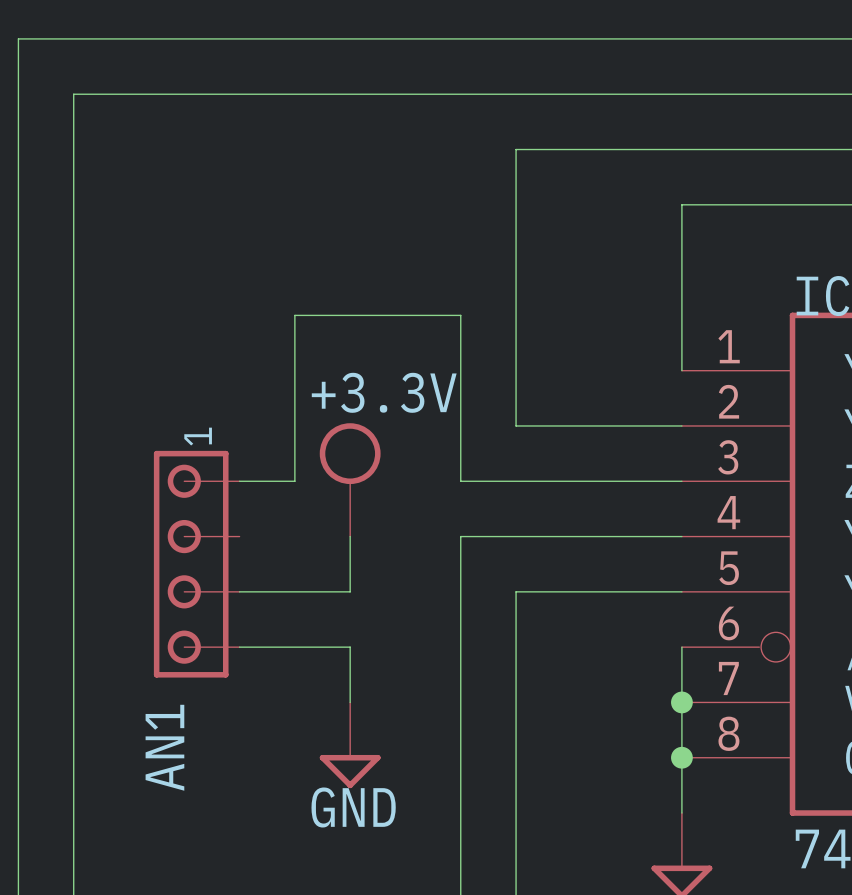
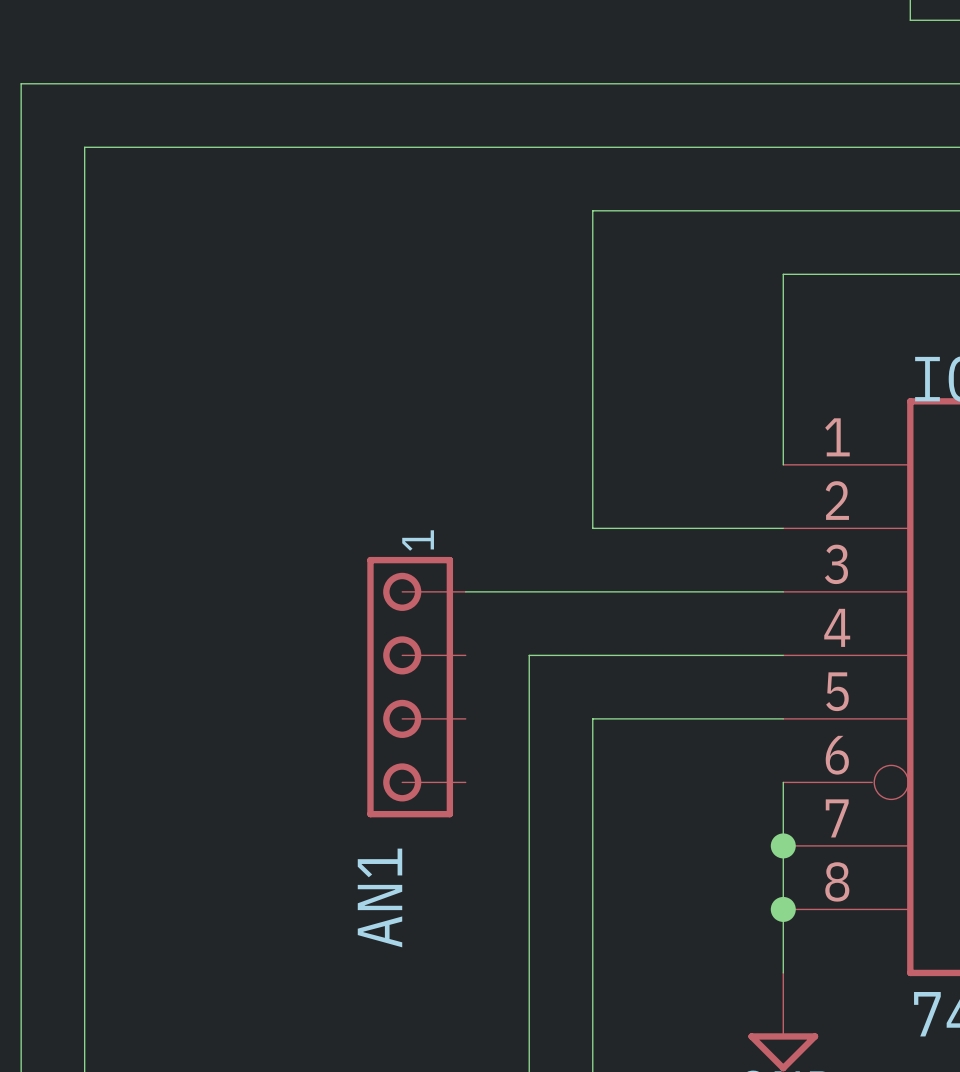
power symbol: +3.3V (350, 479) -> none
wire: (239, 481) (294, 481) (294, 315) (460, 315) (460, 481) -> (465, 591) (529, 591)
wire: (350, 536) (350, 591) (239, 591) -> none
AN1 position: (196, 564) -> (416, 687)
wire: (239, 647) (350, 647) (350, 702) -> none
power symbol: GND (350, 745) -> none

